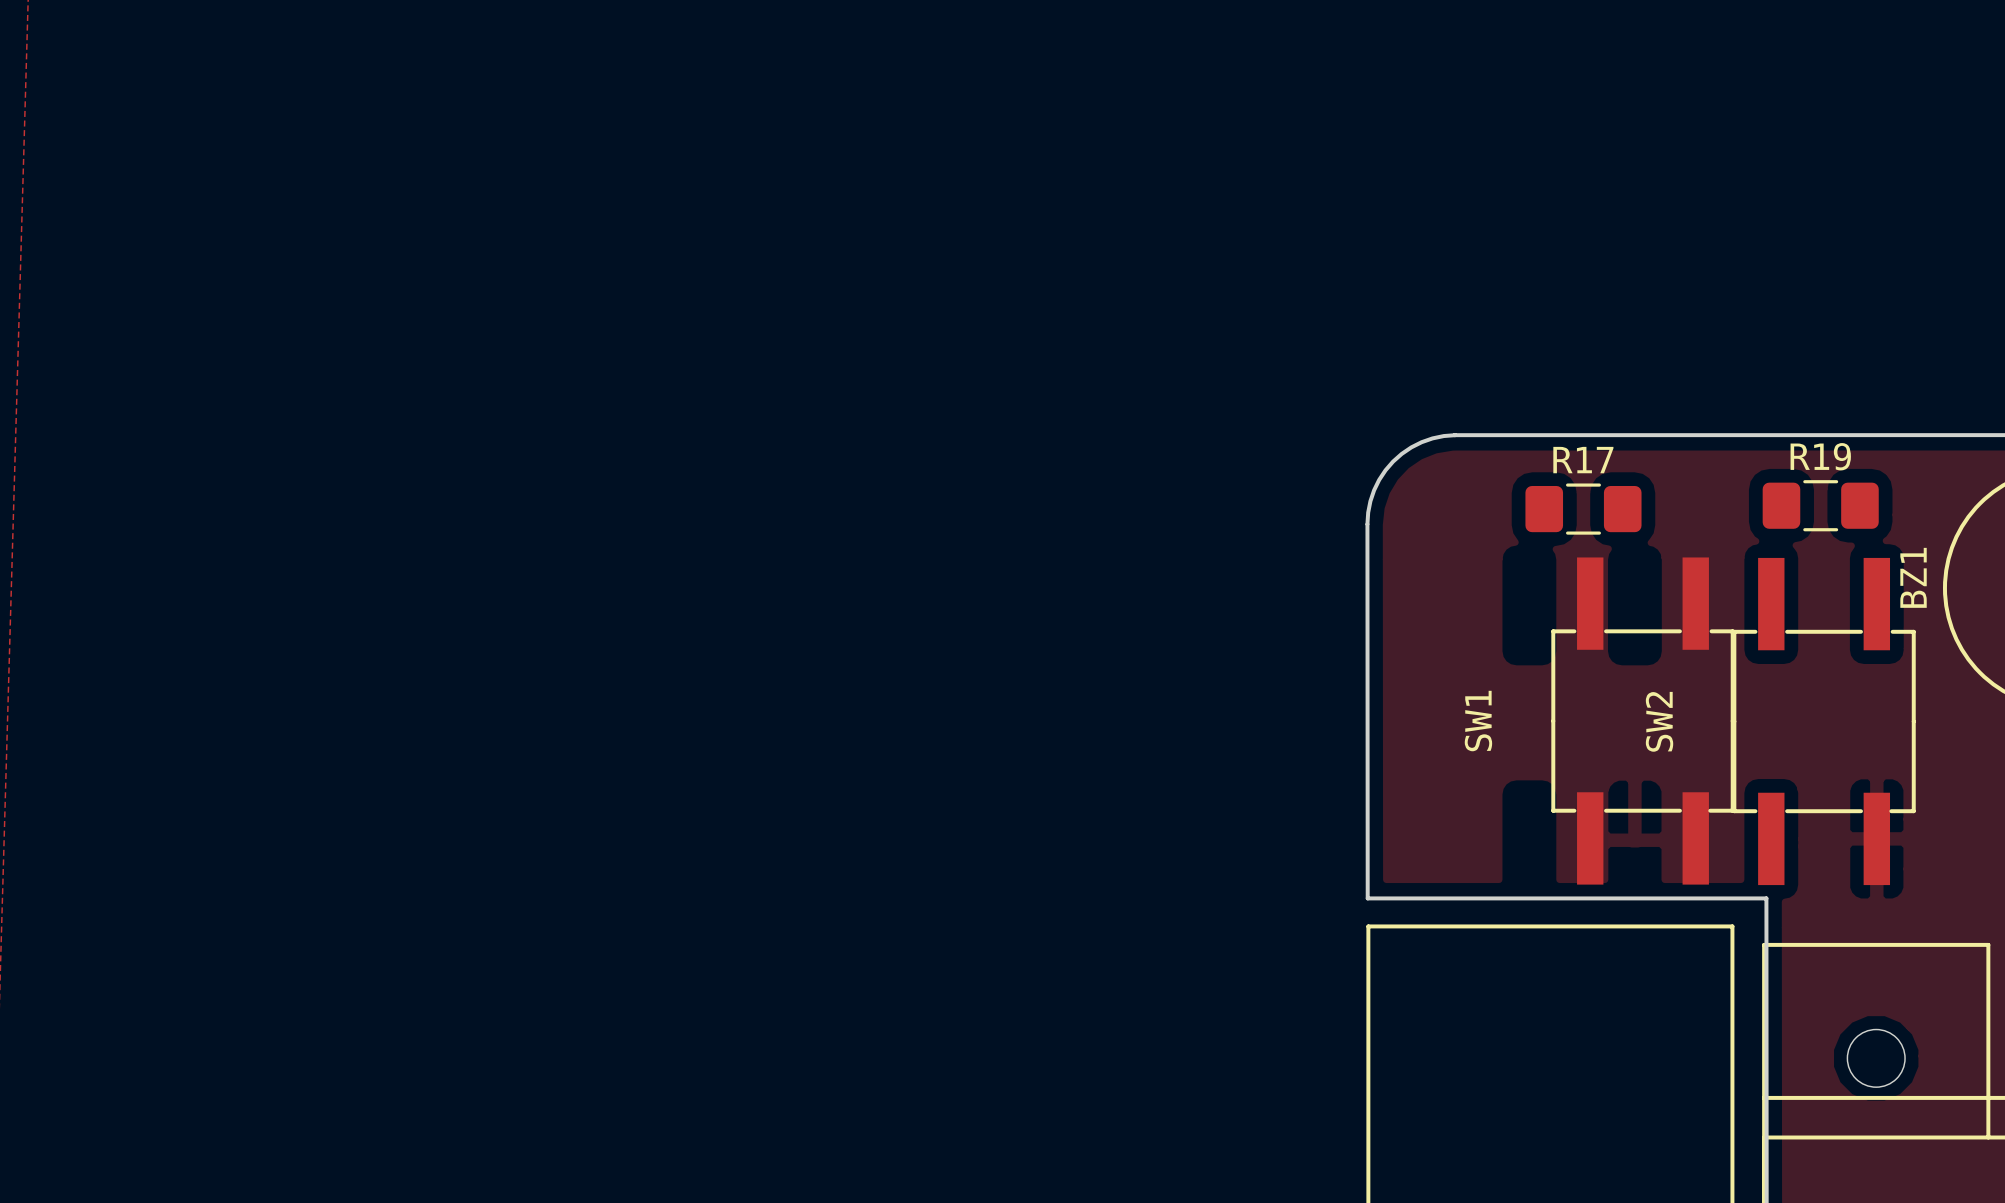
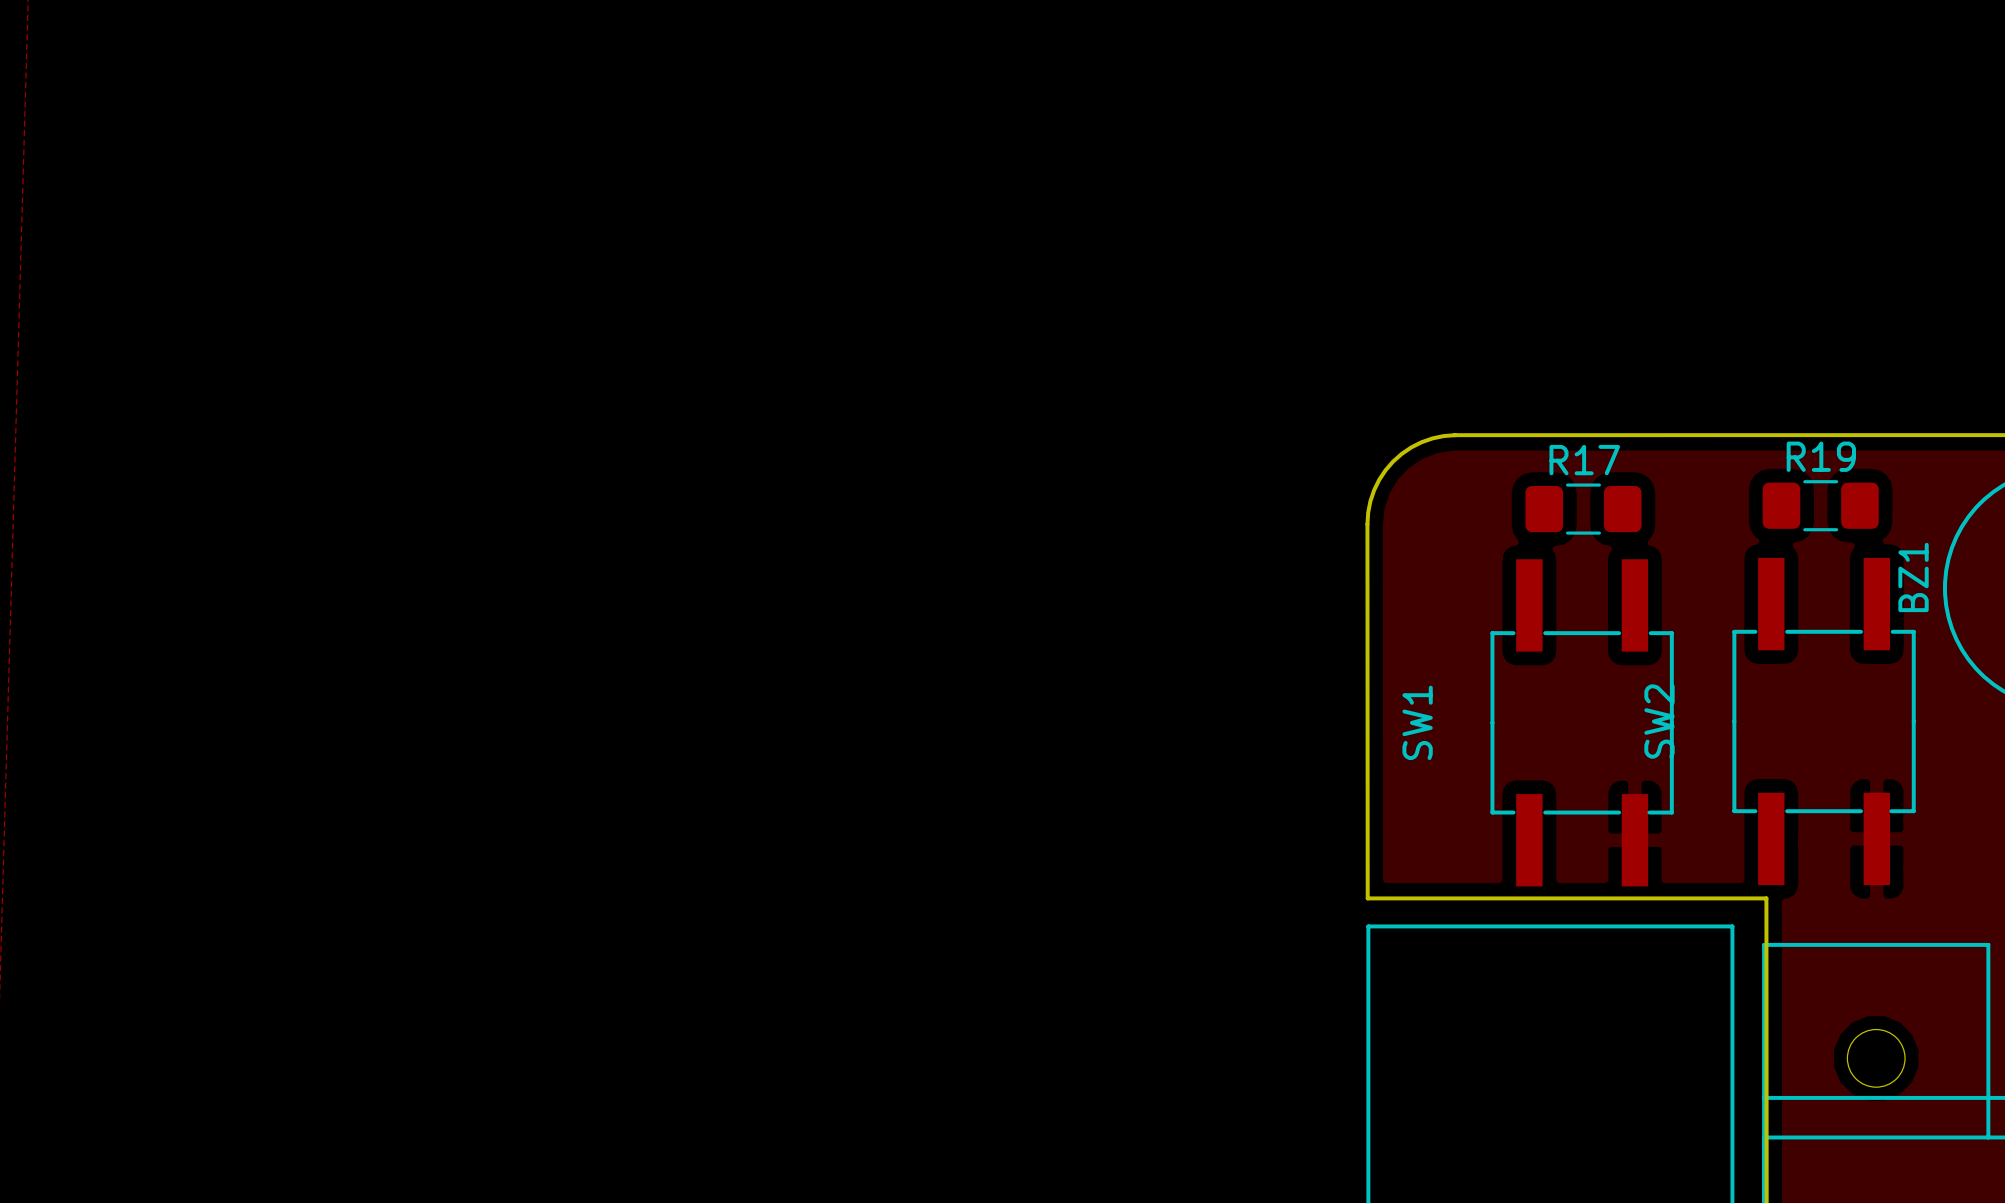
SW1 position: (1642, 721) -> (1582, 722)

